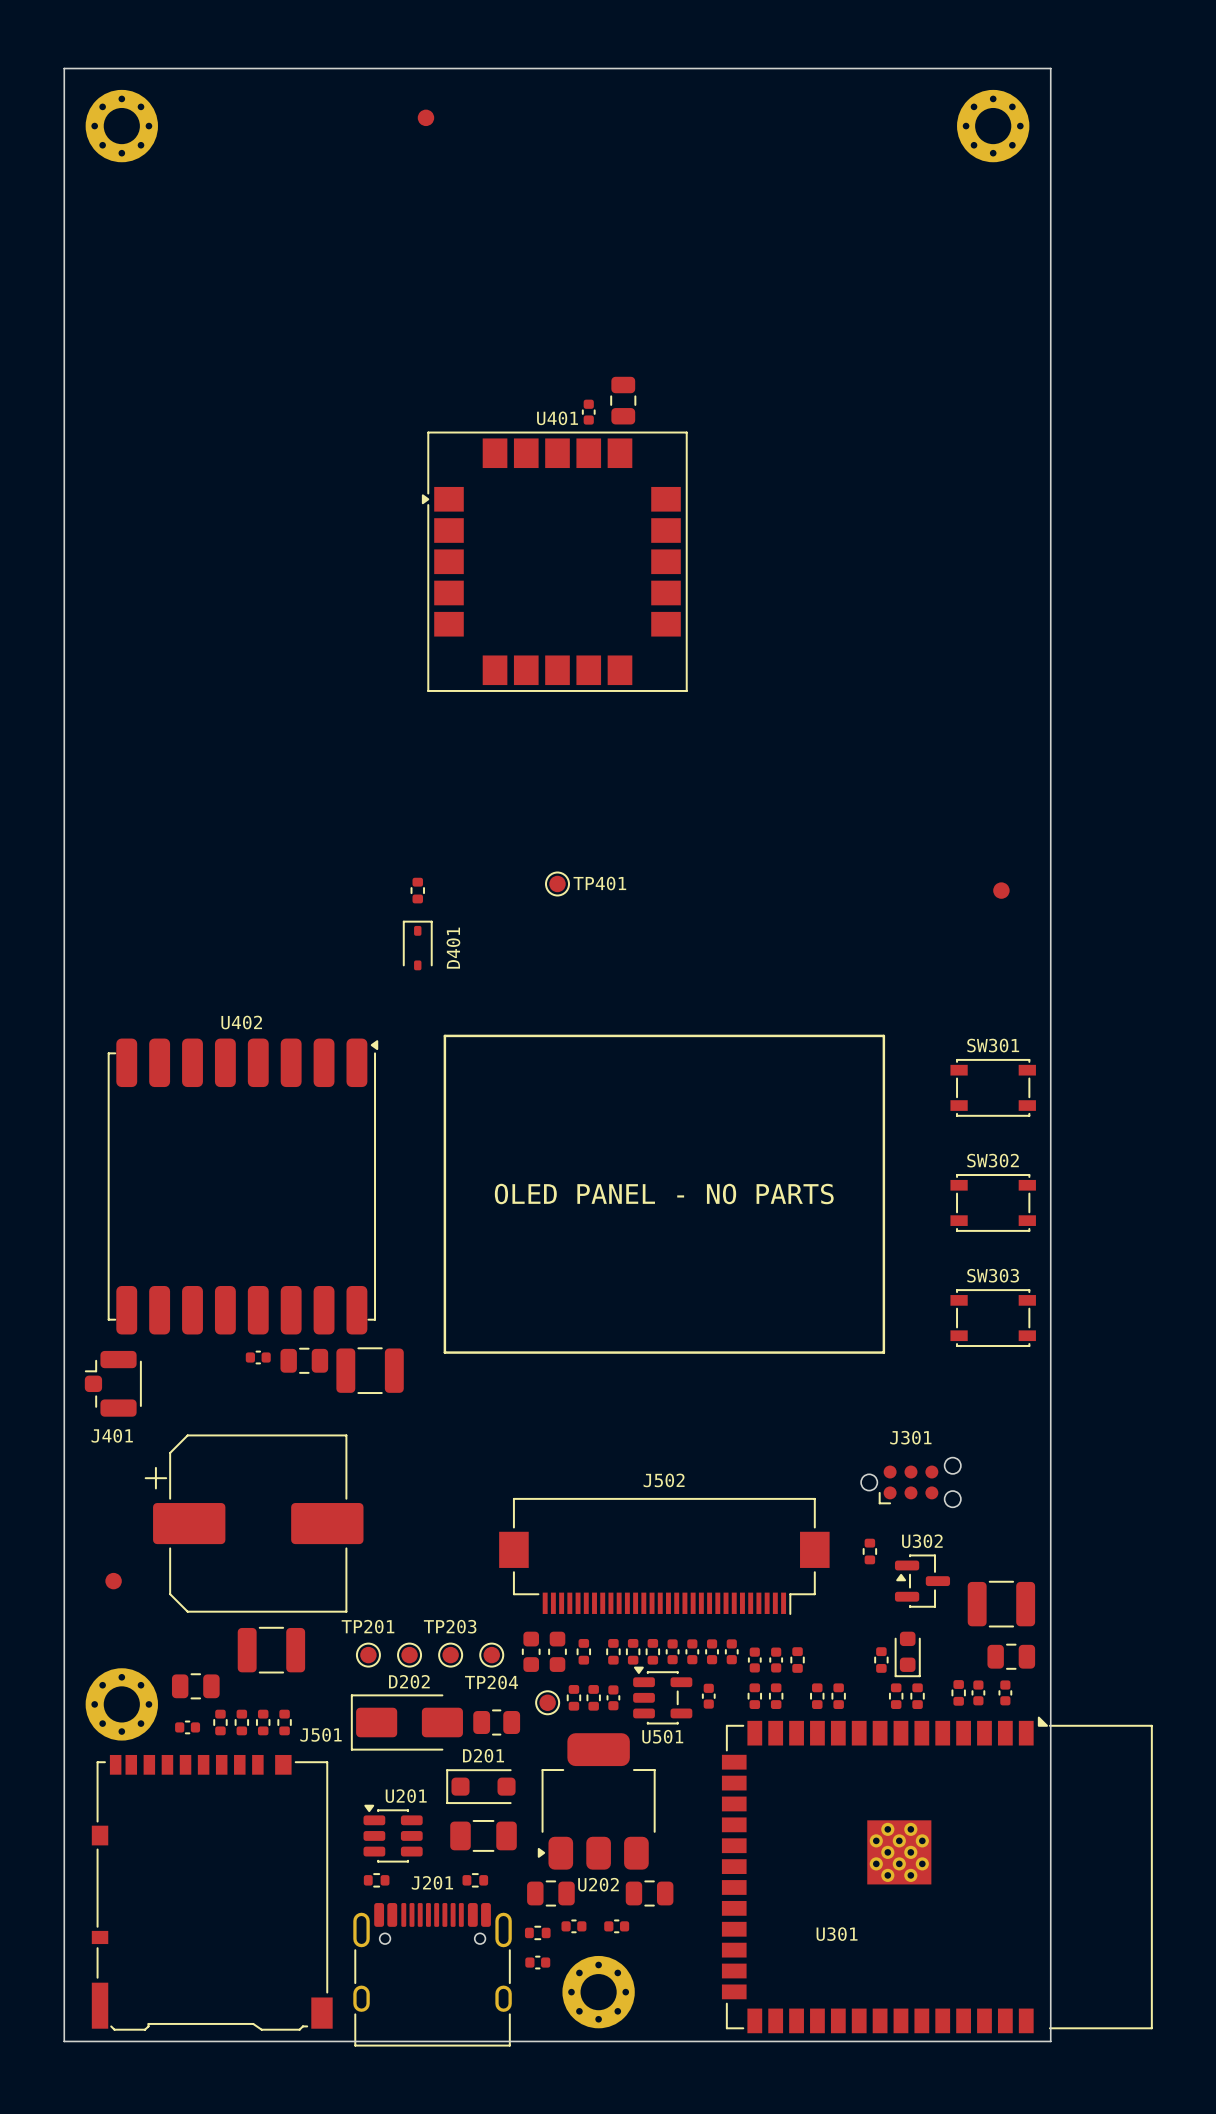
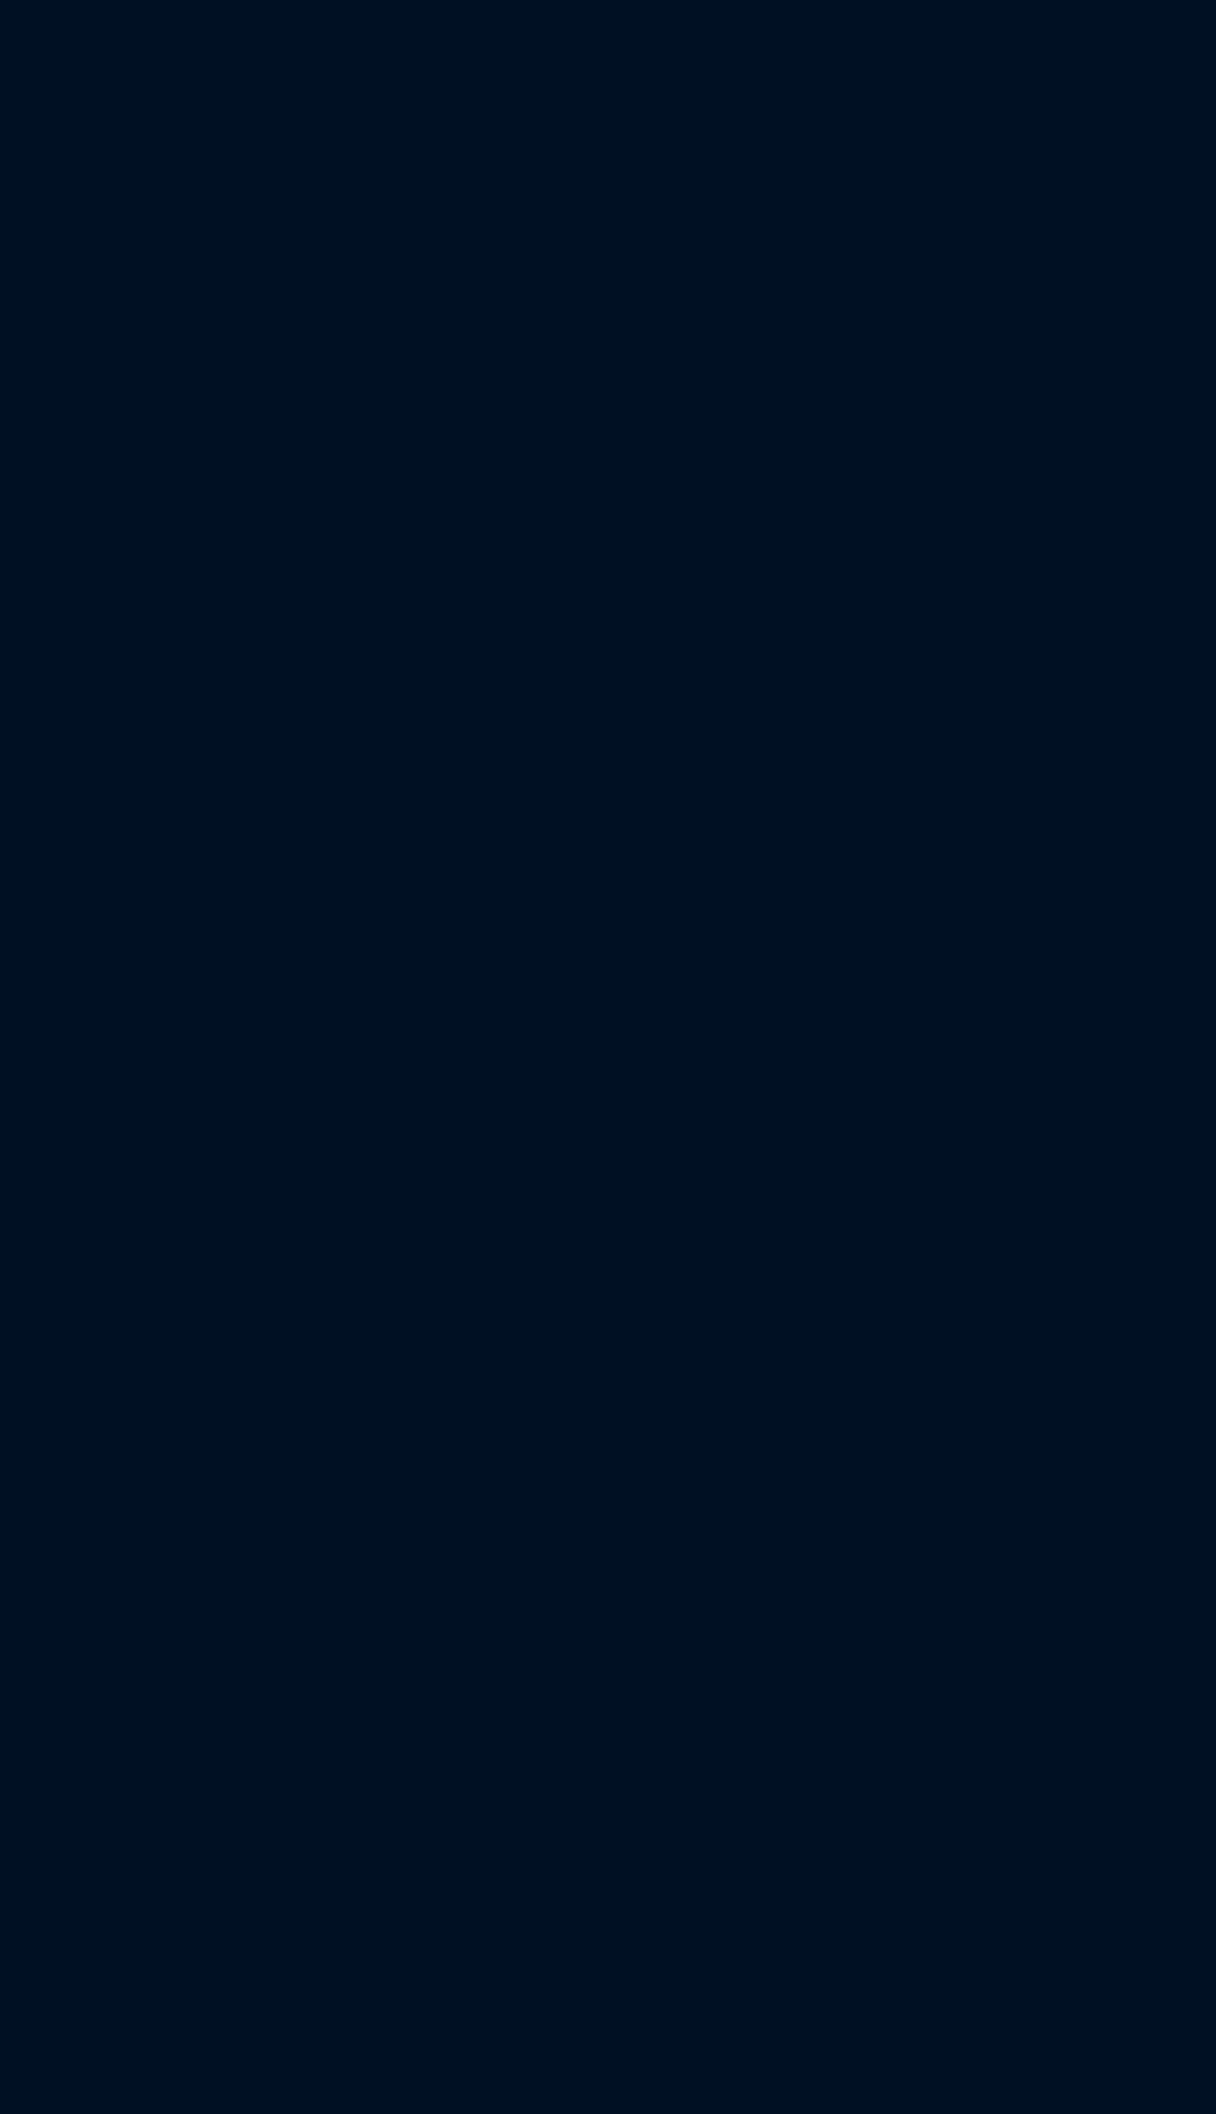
board edge: (64, 68) (1050, 68) (1050, 2041) (64, 2041) (64, 68) -> none
part: (425, 117) -> none
part: (121, 126) -> none
part: (993, 126) -> none
part: (623, 400) -> none
part: (588, 412) -> none
U401: (554, 561) -> none
TP401: (557, 884) -> none
part: (417, 890) -> none
part: (1001, 890) -> none
D401: (417, 945) -> none
line: (444, 1035) (883, 1035) (883, 1352) (444, 1352) (444, 1035) -> none
SW301: (993, 1087) -> none
U402: (242, 1186) -> none
text: OLED PANEL - NO PARTS (664, 1194) -> none
SW302: (993, 1202) -> none
SW303: (993, 1318) -> none
part: (258, 1357) -> none
part: (304, 1360) -> none
part: (370, 1370) -> none
J401: (113, 1383) -> none
J301: (910, 1482) -> none
part: (254, 1523) -> none
part: (869, 1551) -> none
J502: (664, 1556) -> none
part: (113, 1581) -> none
U302: (922, 1581) -> none
part: (1001, 1604) -> none
part: (271, 1650) -> none
part: (531, 1651) -> none
part: (557, 1651) -> none
part: (583, 1651) -> none
part: (613, 1651) -> none
part: (633, 1651) -> none
part: (652, 1651) -> none
part: (672, 1651) -> none
part: (692, 1651) -> none
part: (712, 1651) -> none
part: (731, 1651) -> none
part: (907, 1654) -> none
TP201: (368, 1655) -> none
part: (409, 1655) -> none
TP203: (450, 1655) -> none
TP204: (491, 1655) -> none
part: (1011, 1656) -> none
part: (754, 1660) -> none
part: (776, 1660) -> none
part: (797, 1660) -> none
part: (881, 1660) -> none
part: (195, 1686) -> none
part: (958, 1692) -> none
part: (978, 1692) -> none
part: (1005, 1692) -> none
U501: (662, 1695) -> none
part: (708, 1696) -> none
part: (754, 1696) -> none
part: (776, 1696) -> none
part: (817, 1696) -> none
part: (838, 1696) -> none
part: (896, 1696) -> none
part: (917, 1696) -> none
part: (573, 1697) -> none
part: (593, 1697) -> none
part: (613, 1697) -> none
part: (547, 1702) -> none
part: (121, 1704) -> none
part: (220, 1722) -> none
part: (241, 1722) -> none
part: (263, 1722) -> none
part: (284, 1722) -> none
D202: (406, 1722) -> none
part: (496, 1722) -> none
part: (187, 1727) -> none
D201: (480, 1786) -> none
U202: (596, 1801) -> none
U201: (393, 1833) -> none
part: (483, 1835) -> none
U301: (937, 1874) -> none
part: (376, 1880) -> none
part: (475, 1880) -> none
J501: (212, 1892) -> none
part: (550, 1893) -> none
part: (649, 1893) -> none
part: (573, 1926) -> none
part: (616, 1926) -> none
part: (537, 1932) -> none
part: (537, 1962) -> none
J201: (432, 1974) -> none
part: (598, 1992) -> none

